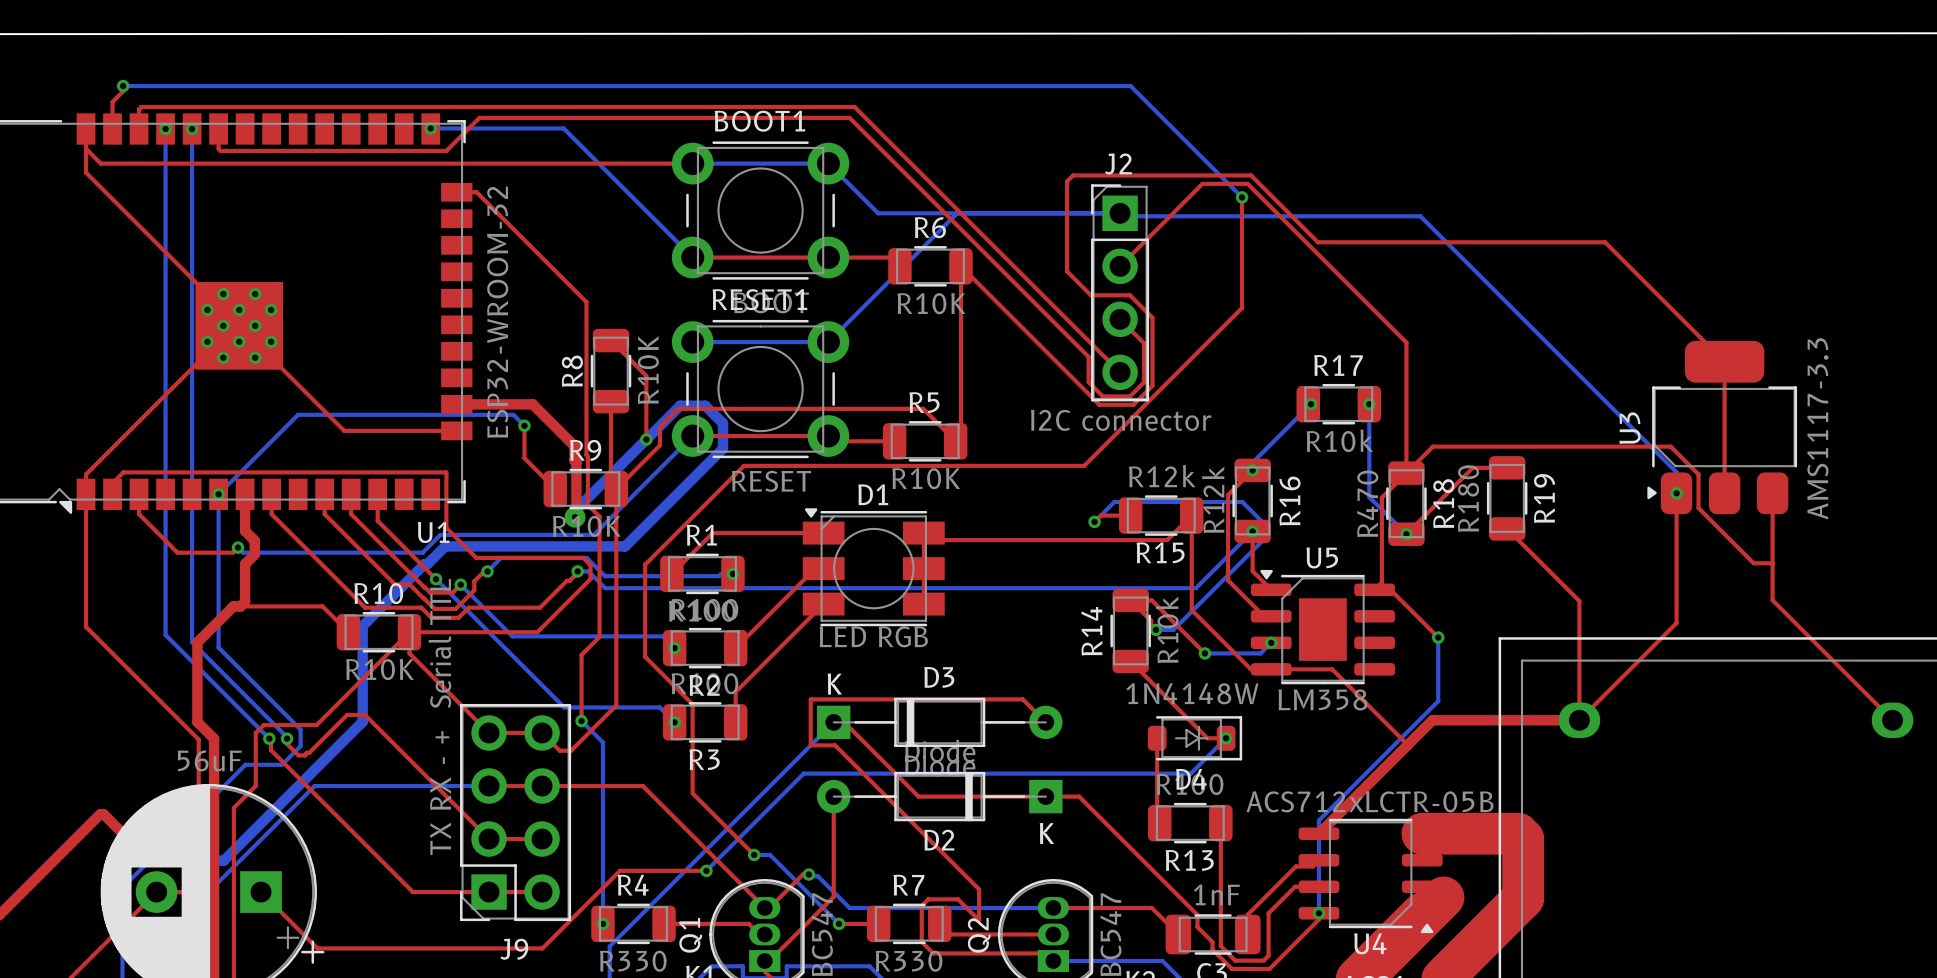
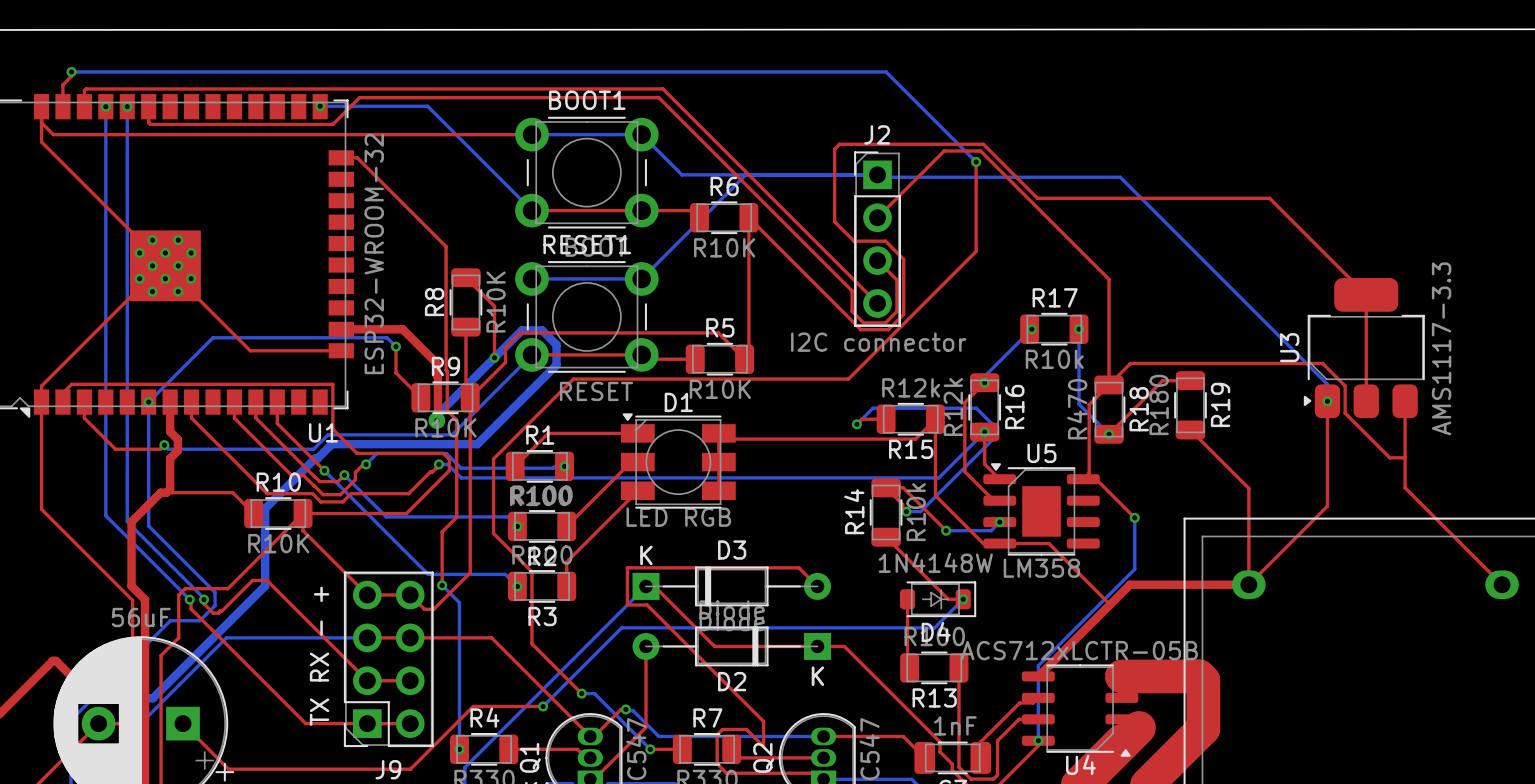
J9 value: TX RX - + Serial TTL (439, 716) -> TX RX - + (319, 656)

